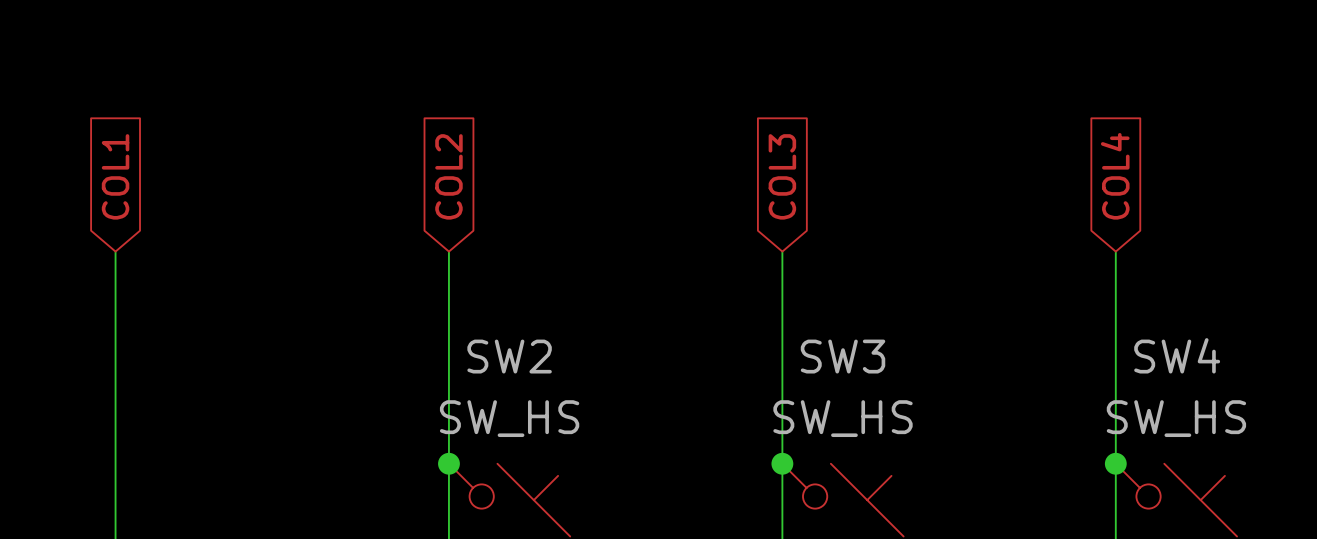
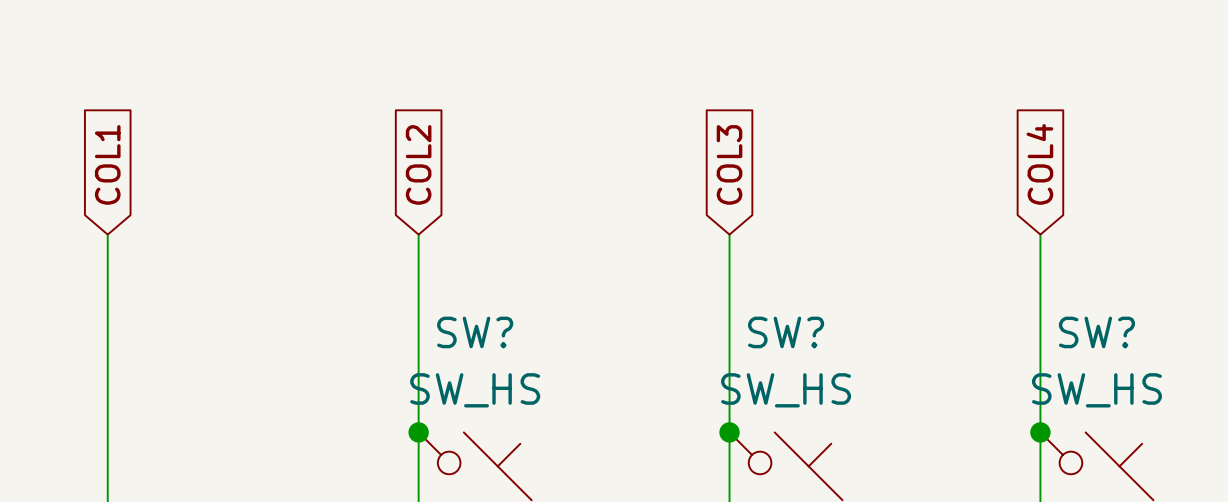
SW4 name: SW4 (1177, 355) -> SW? (1096, 332)
SW2 name: SW2 (509, 356) -> SW? (475, 332)
SW3 name: SW3 (843, 356) -> SW? (786, 332)

